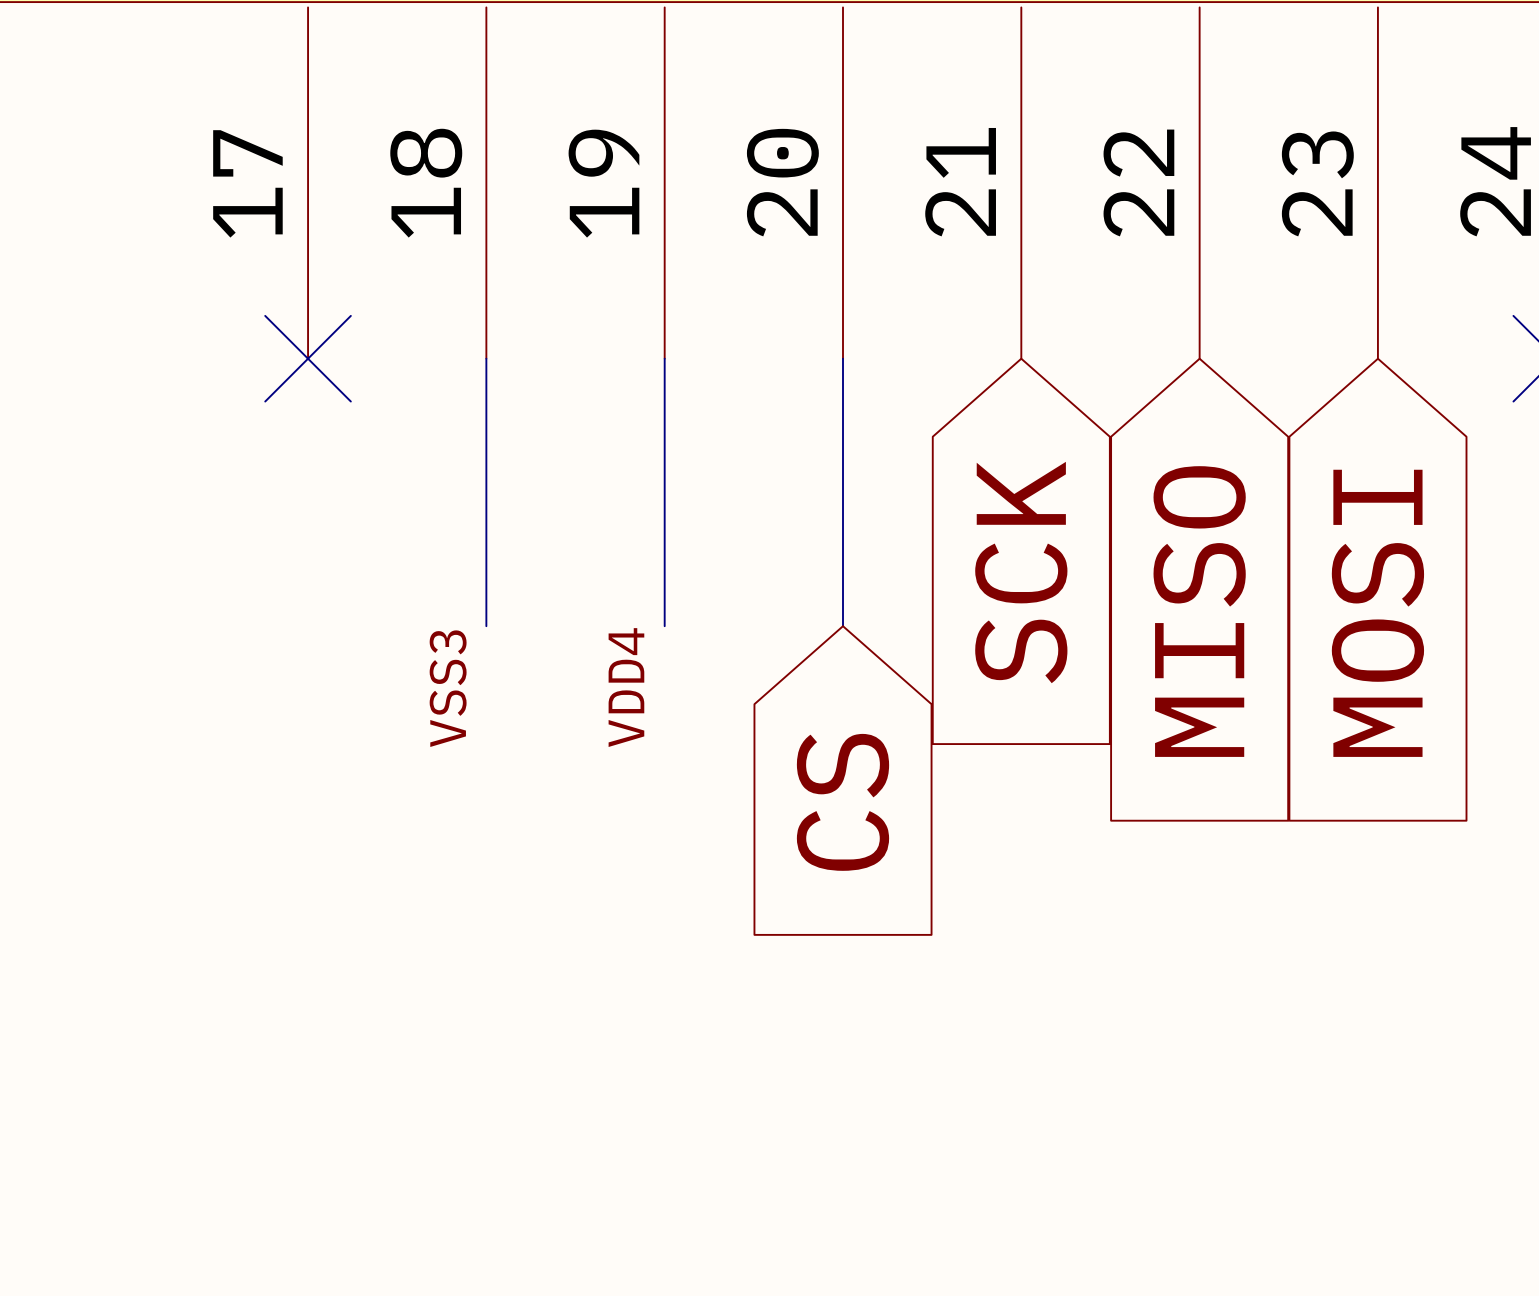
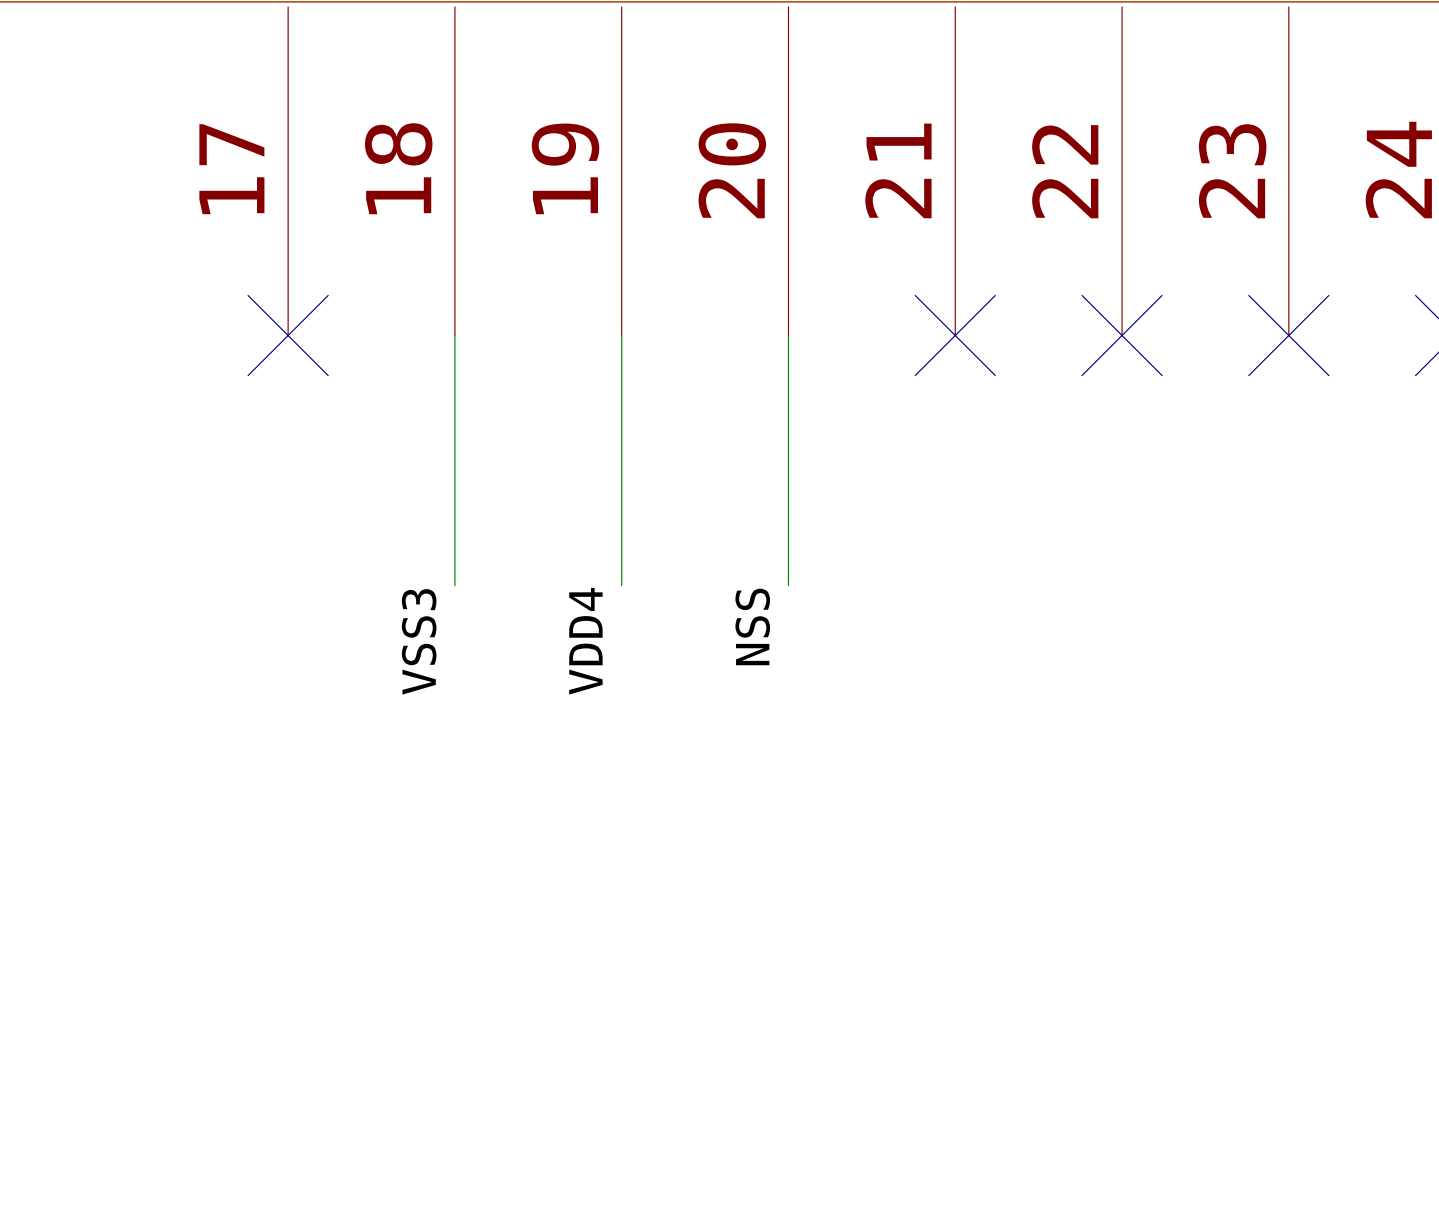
no-connect mark: none -> (955, 335)
no-connect mark: none -> (1122, 335)
no-connect mark: none -> (1288, 335)
global label: SCK (1021, 572) -> none
global label: MISO (1199, 611) -> none
global label: MOSI (1377, 613) -> none
label: none -> NSS (752, 626)
global label: CS (843, 802) -> none

